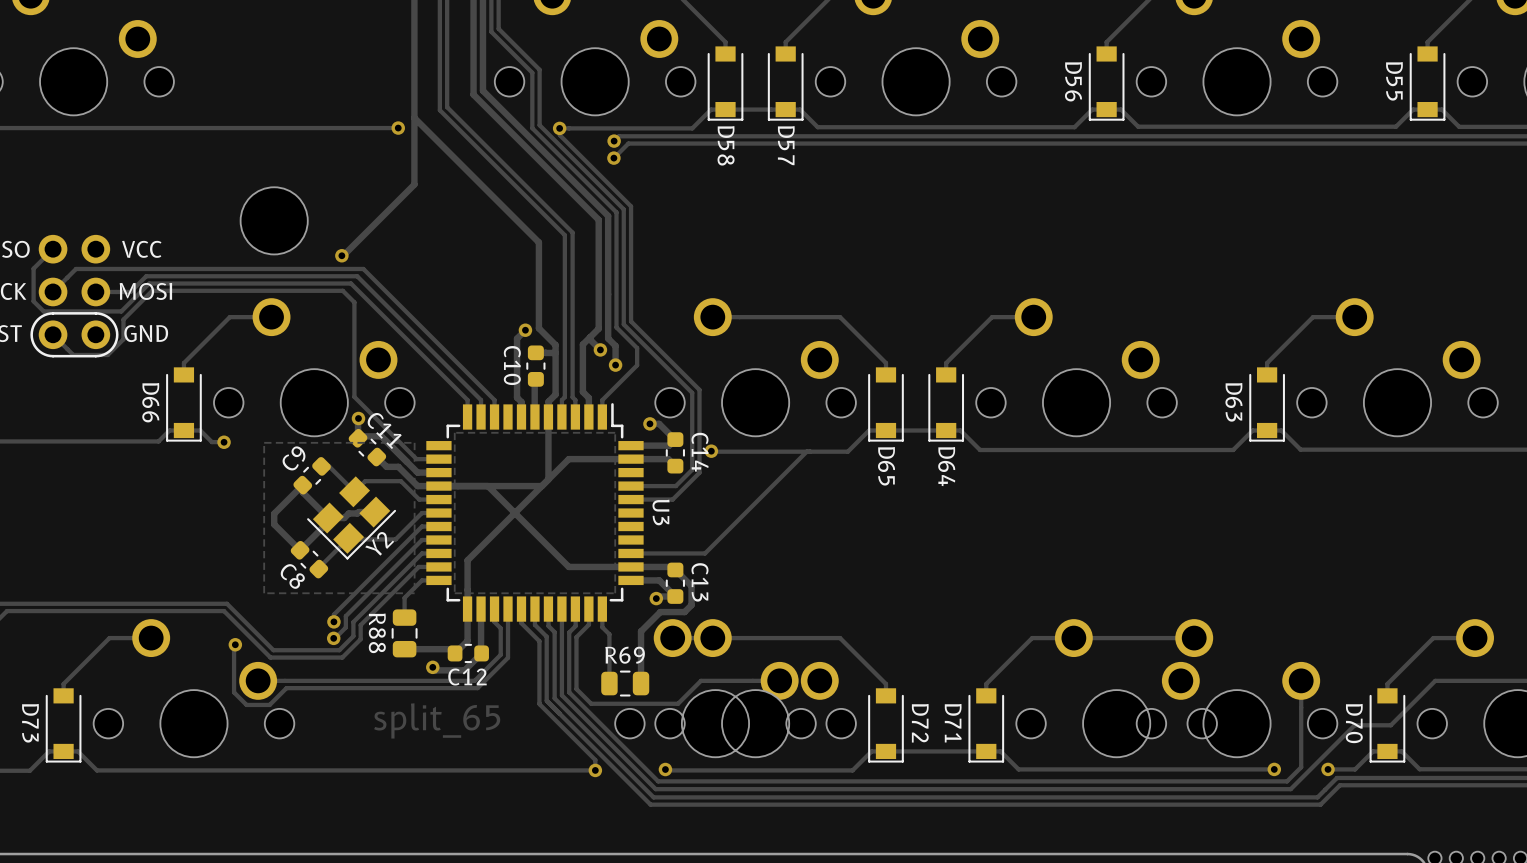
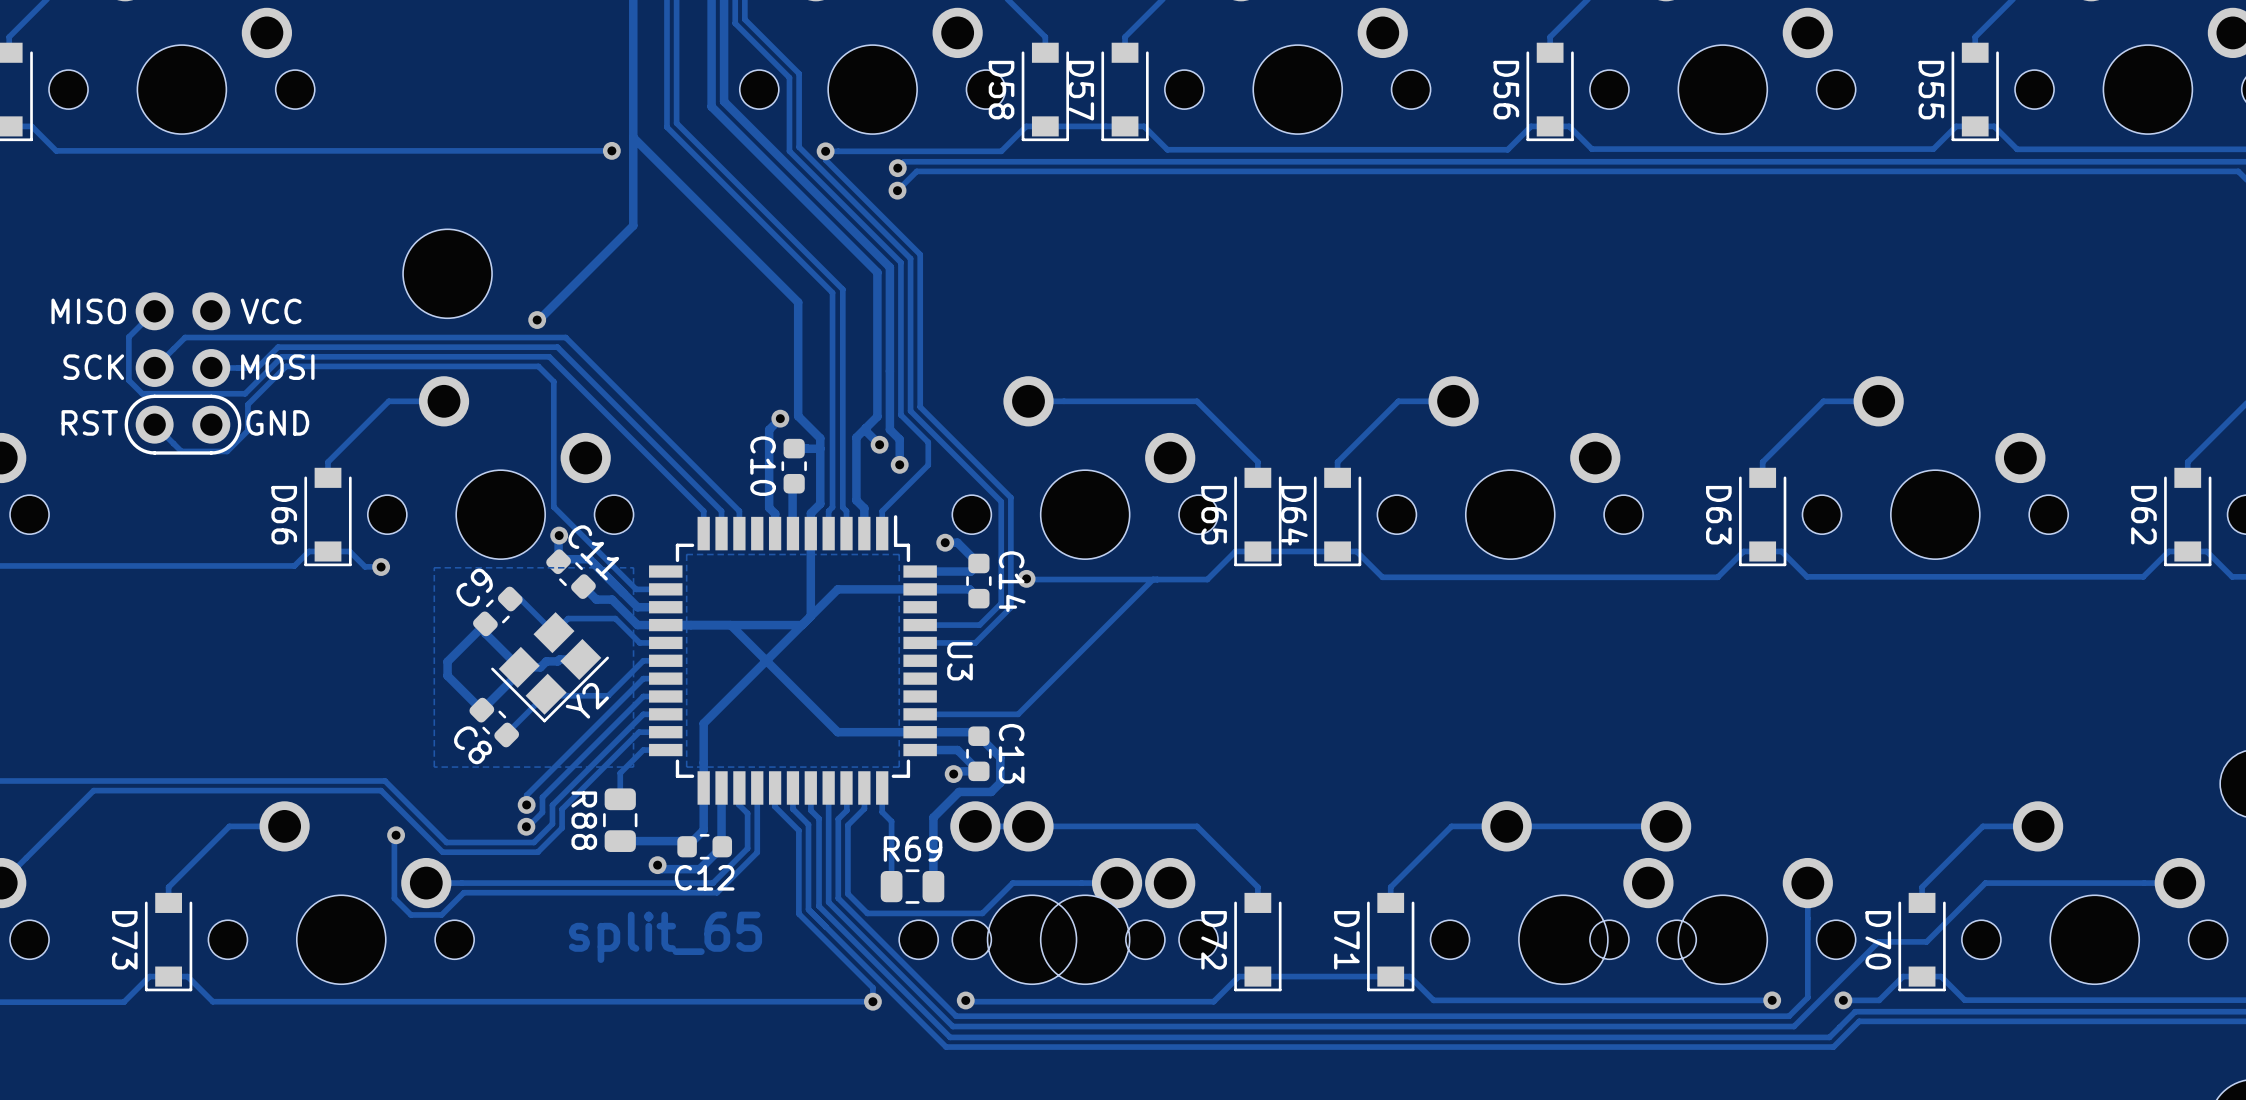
D58 name position: D58 (726, 145) -> D58 (1001, 90)
D57 name position: D57 (786, 145) -> D57 (1081, 90)
D65 name position: D65 (886, 466) -> D65 (1214, 515)
D64 name position: D64 (946, 466) -> D64 (1294, 515)
D72 name position: D72 (920, 723) -> D72 (1214, 940)

